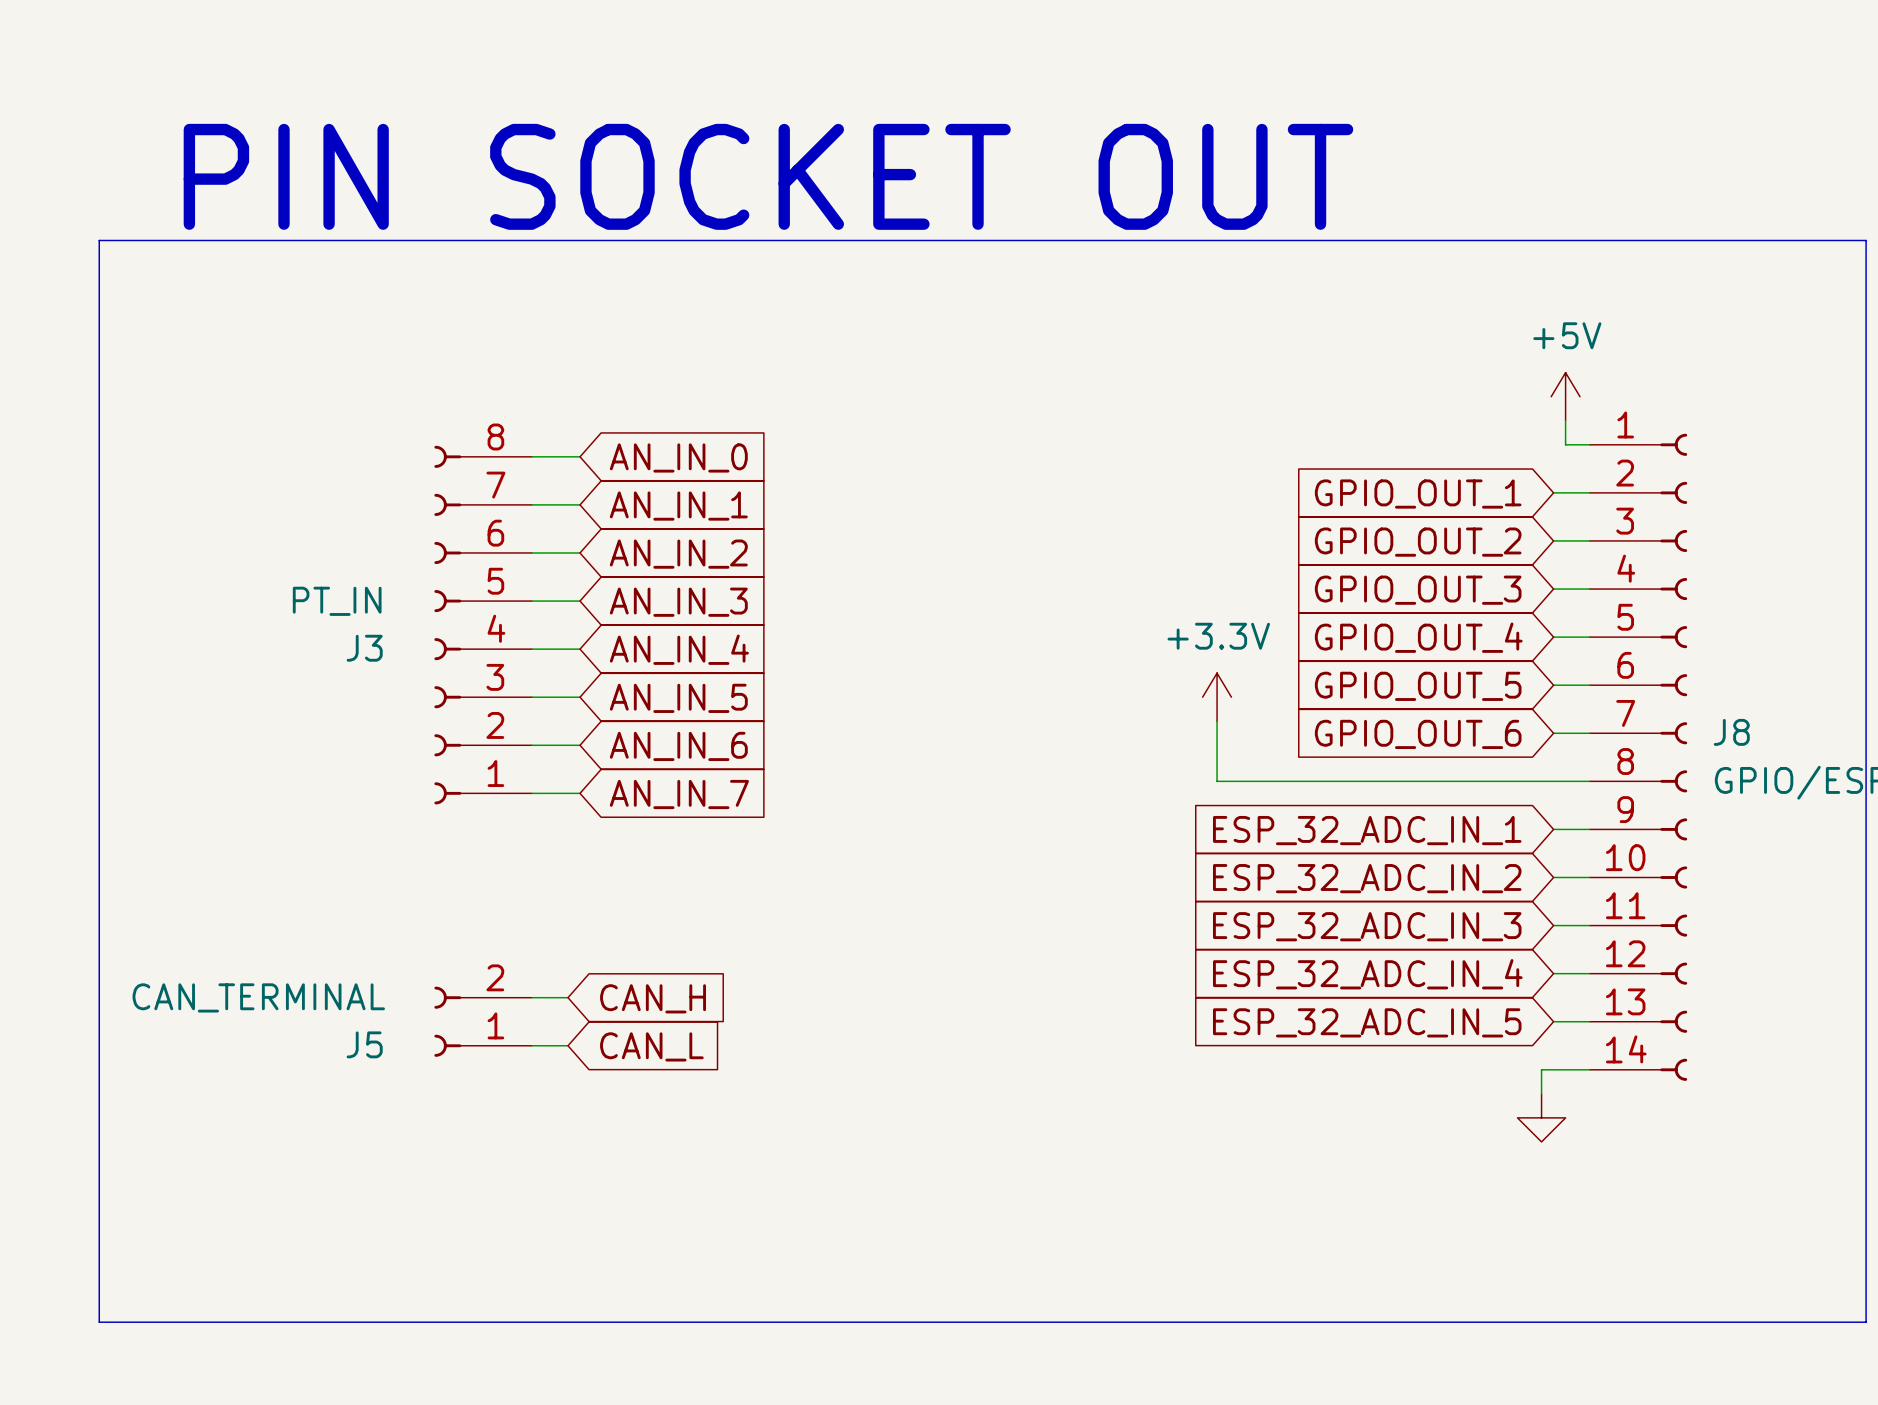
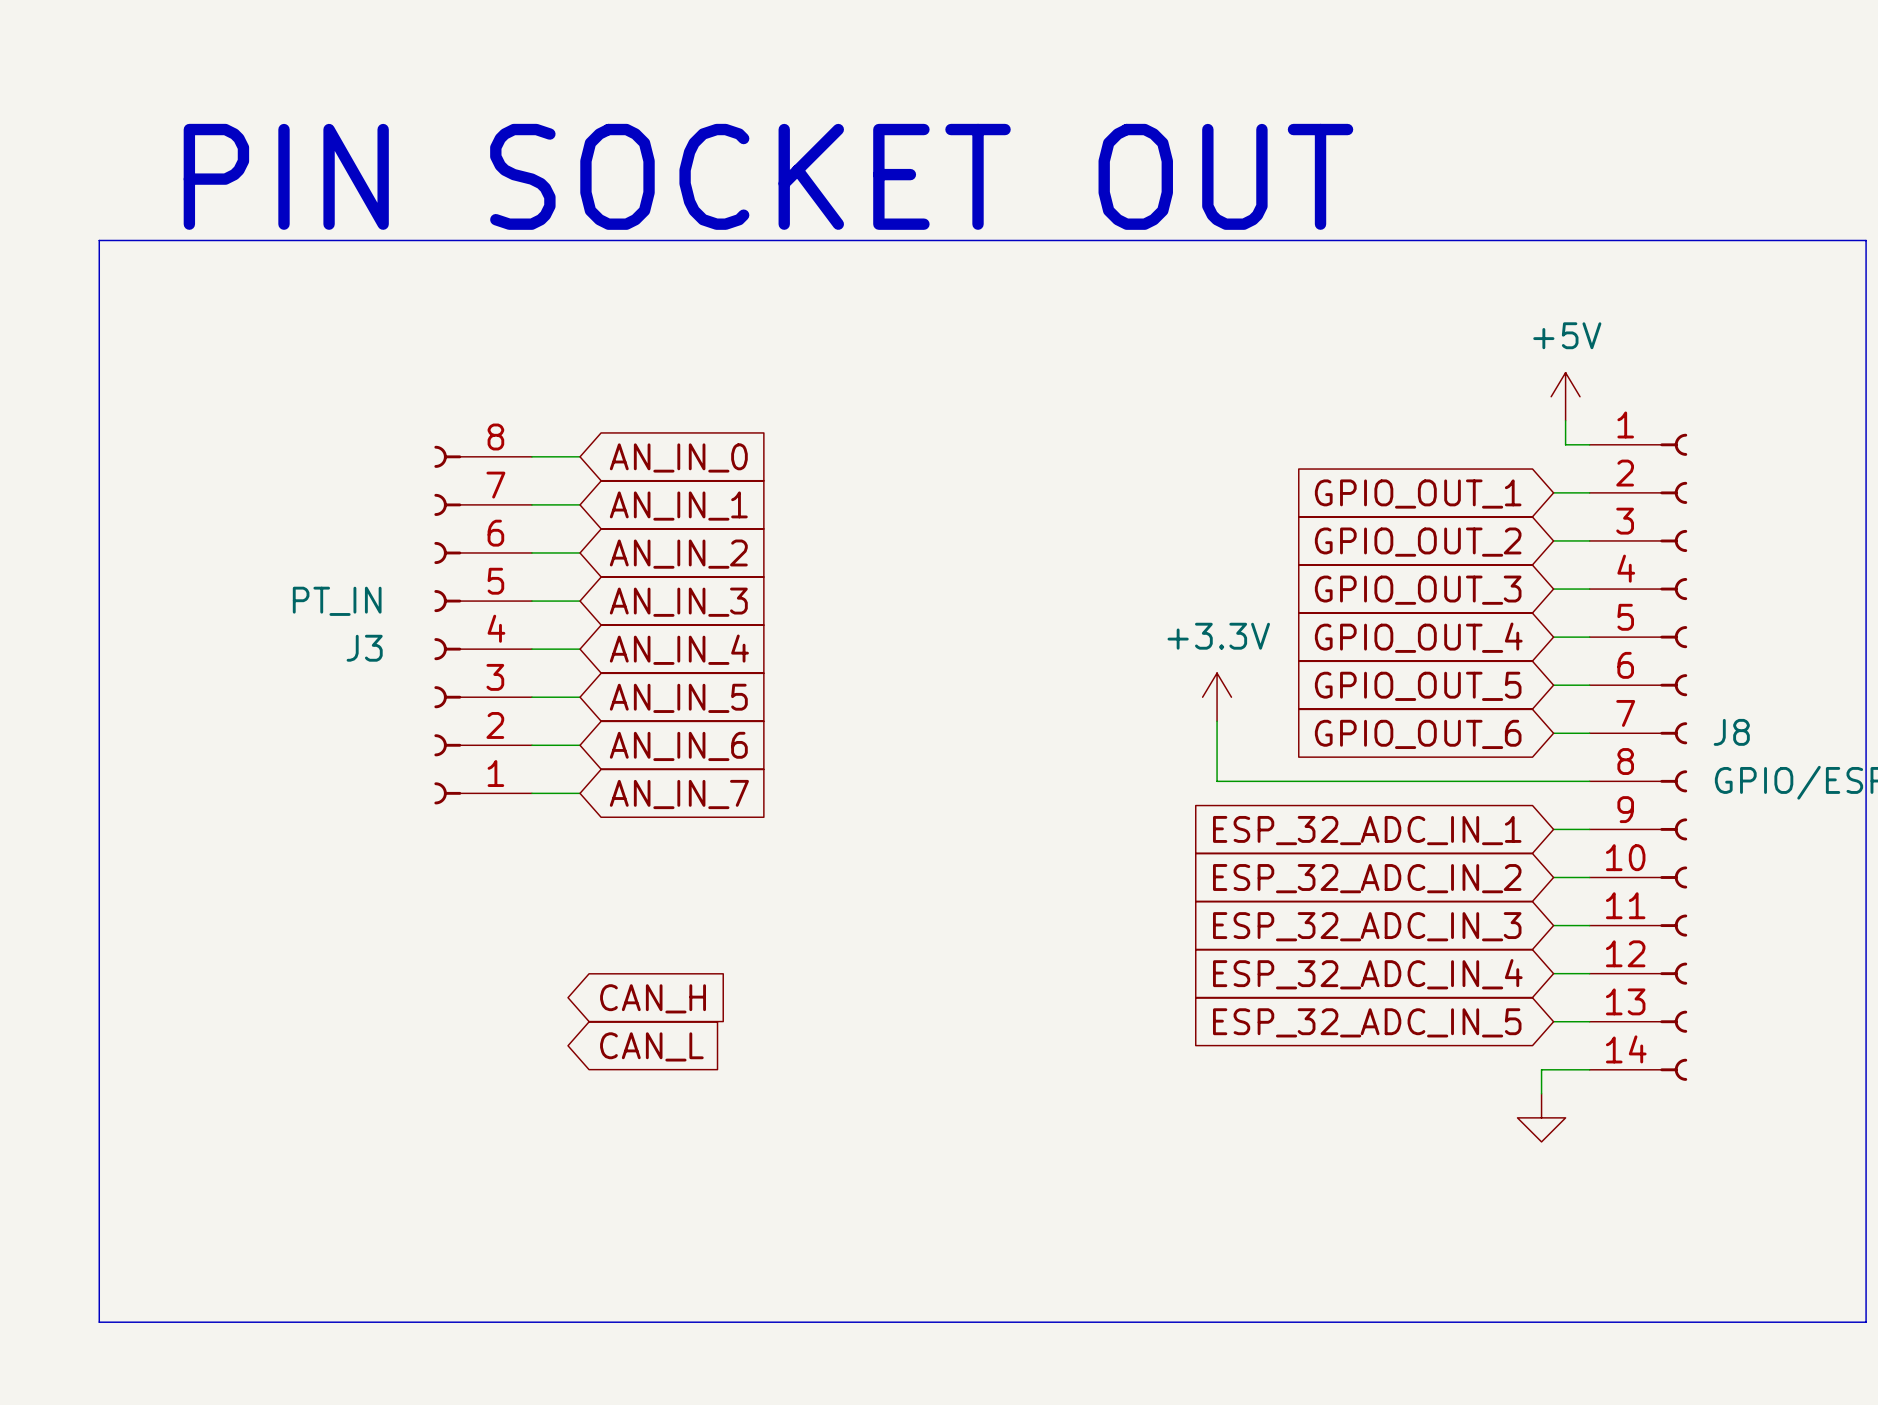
wire: (531, 997) (568, 997) -> none
J5: CAN_TERMINAL (483, 1021) -> none
wire: (531, 1045) (568, 1045) -> none

